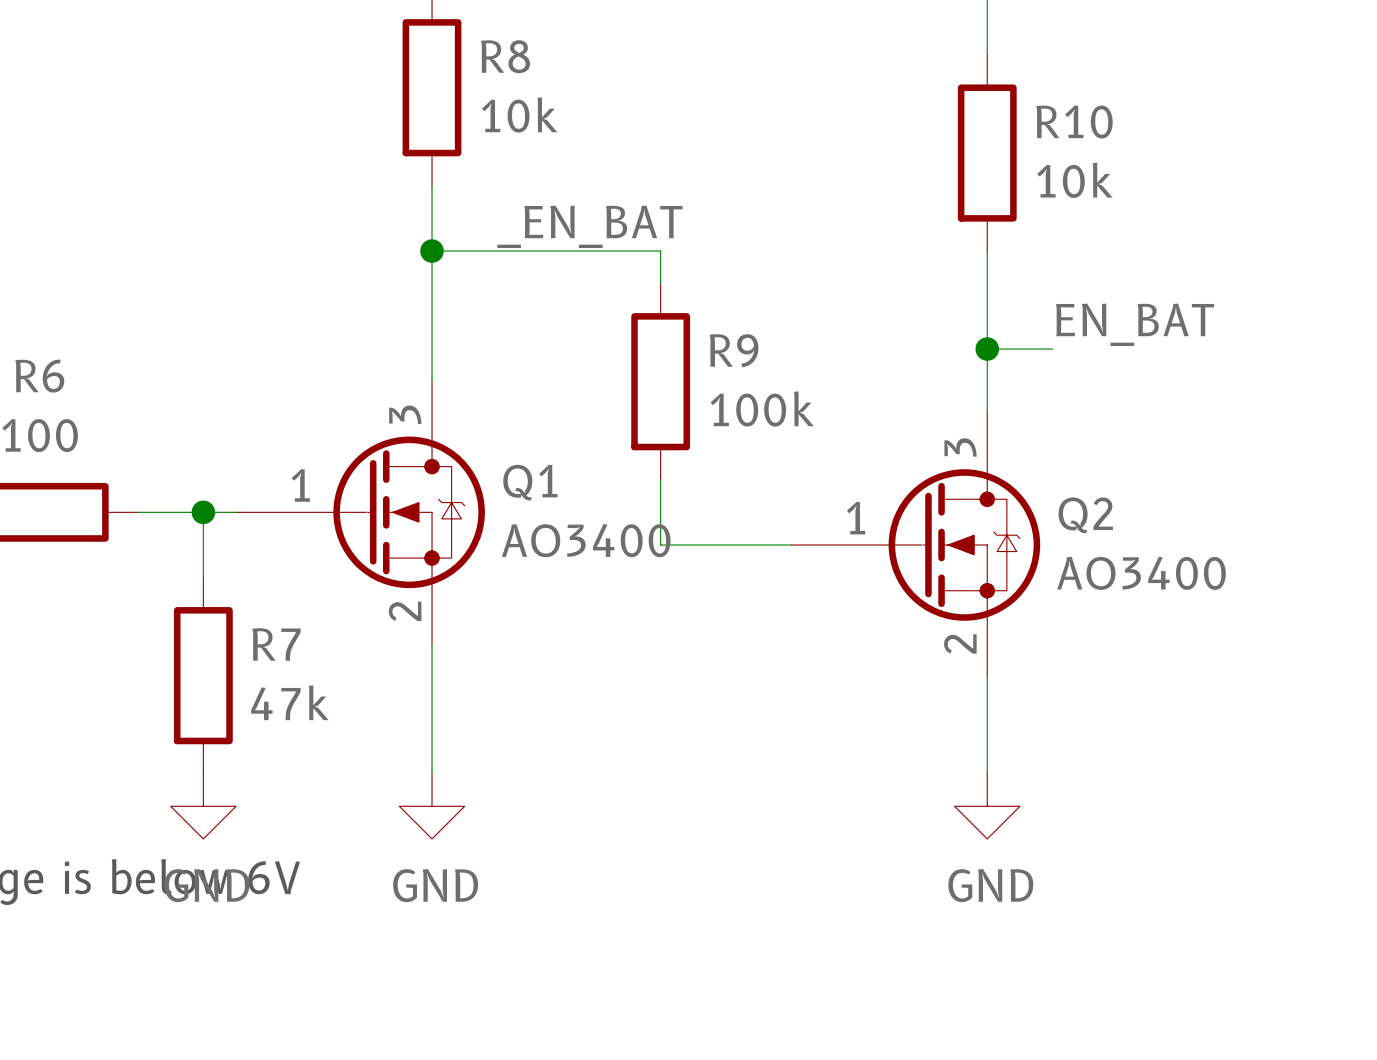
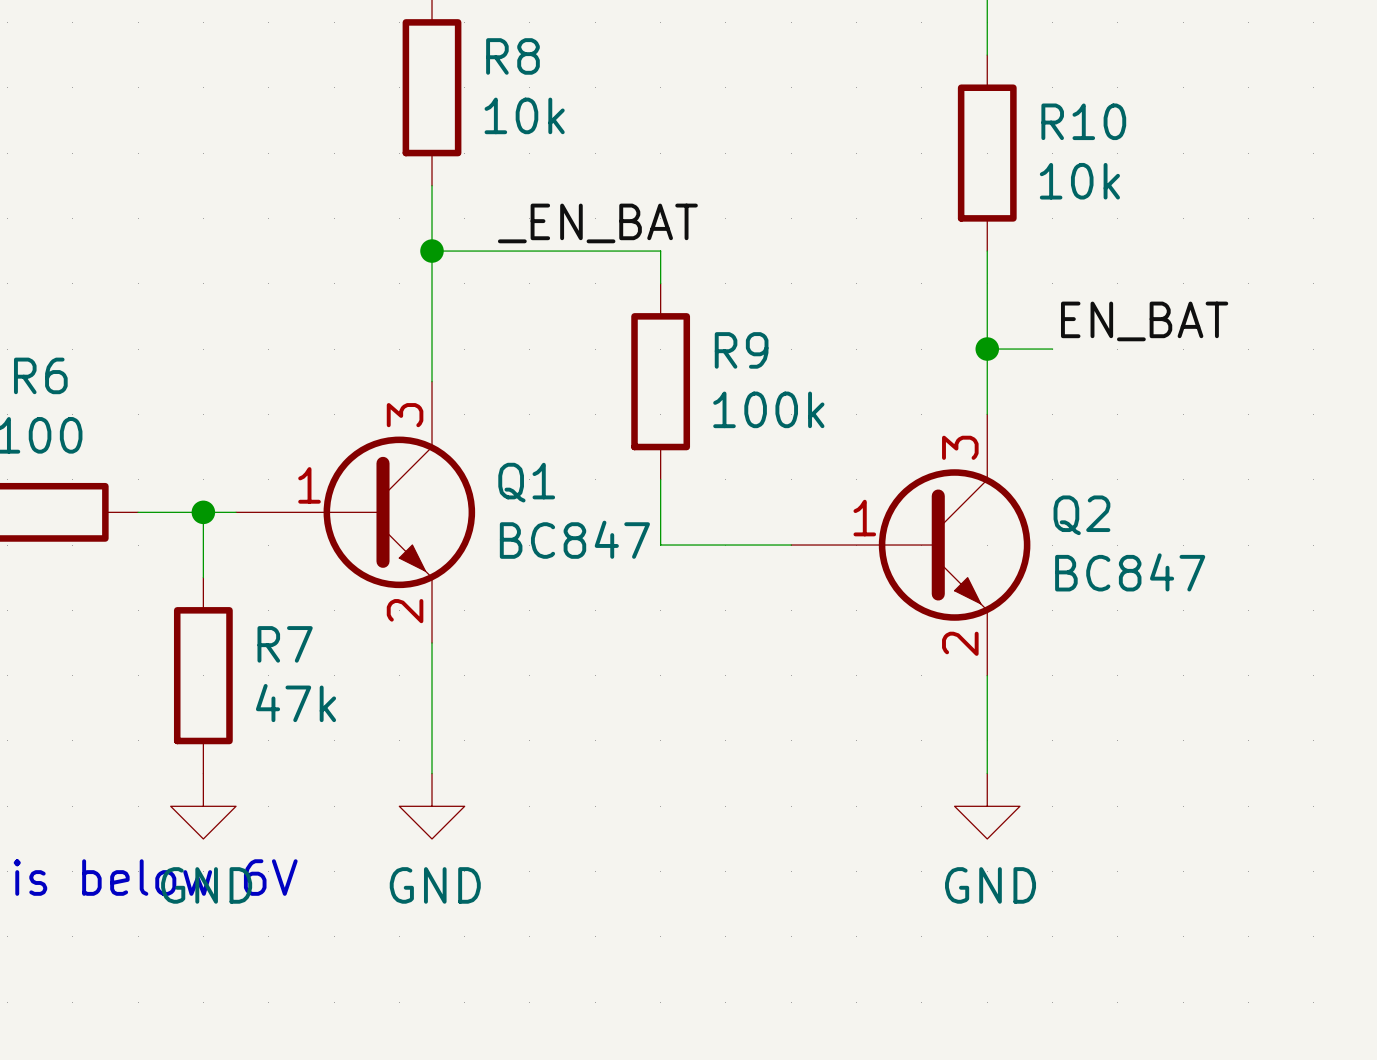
Q1 symbol: [236, 381, 485, 643] -> [236, 381, 476, 643]
Q2 symbol: [791, 414, 1041, 676] -> [791, 414, 1031, 676]
Q1 value: AO3400 (586, 540) -> BC847 (574, 539)
Q2 value: AO3400 (1141, 573) -> BC847 (1130, 572)

